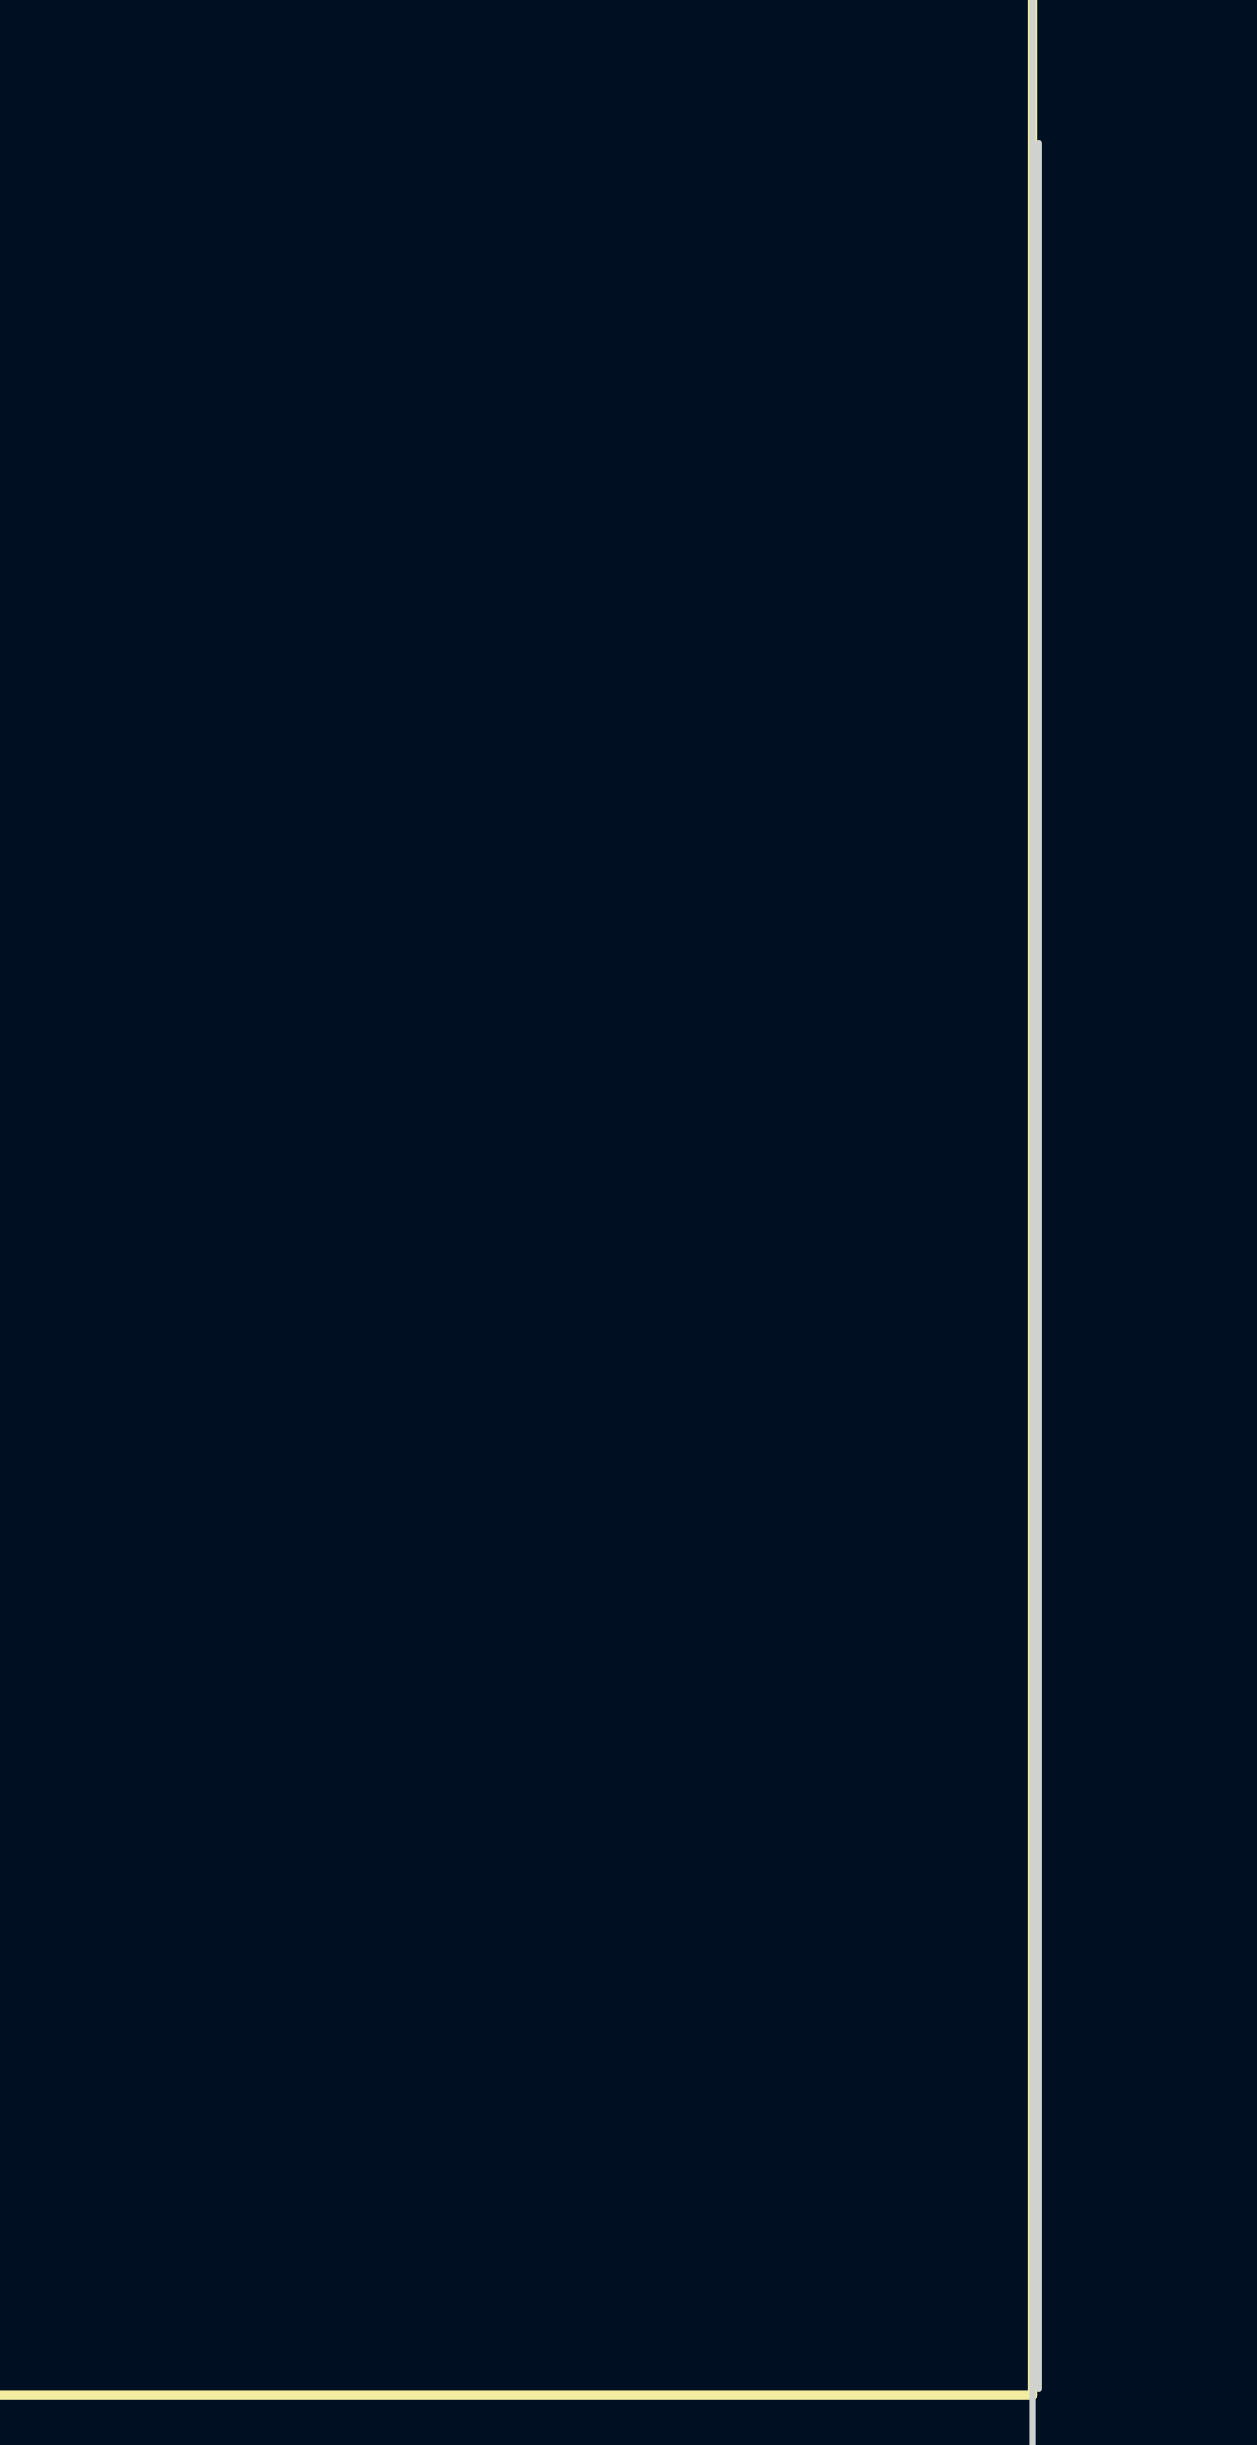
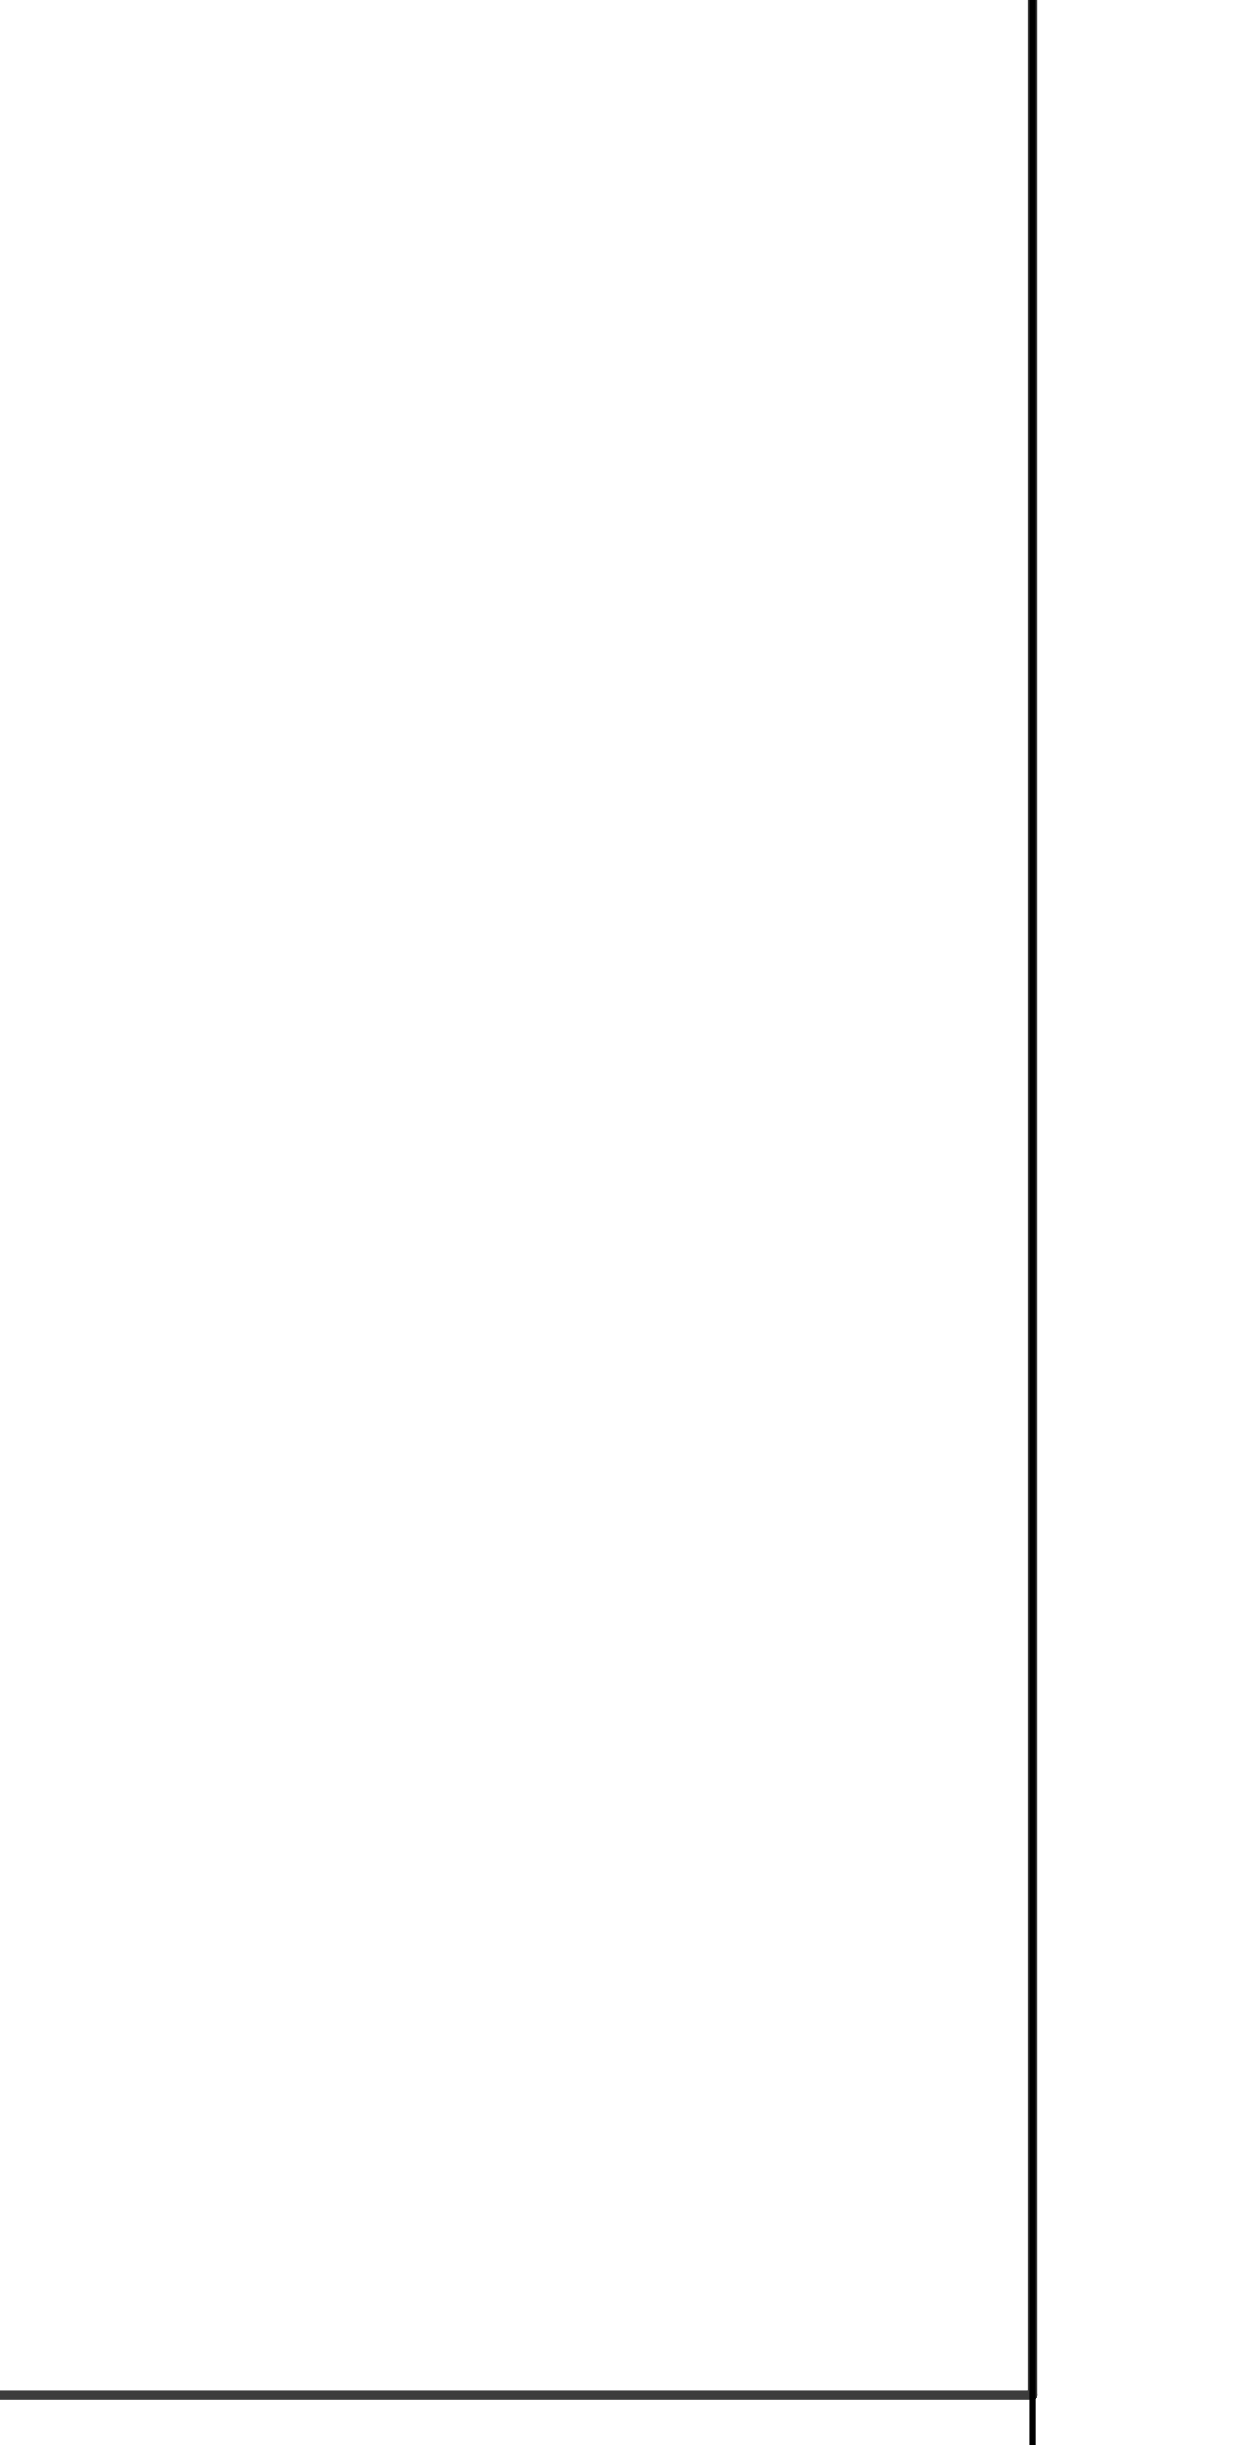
board edge: (1038, 143) (1038, 2388) -> none

